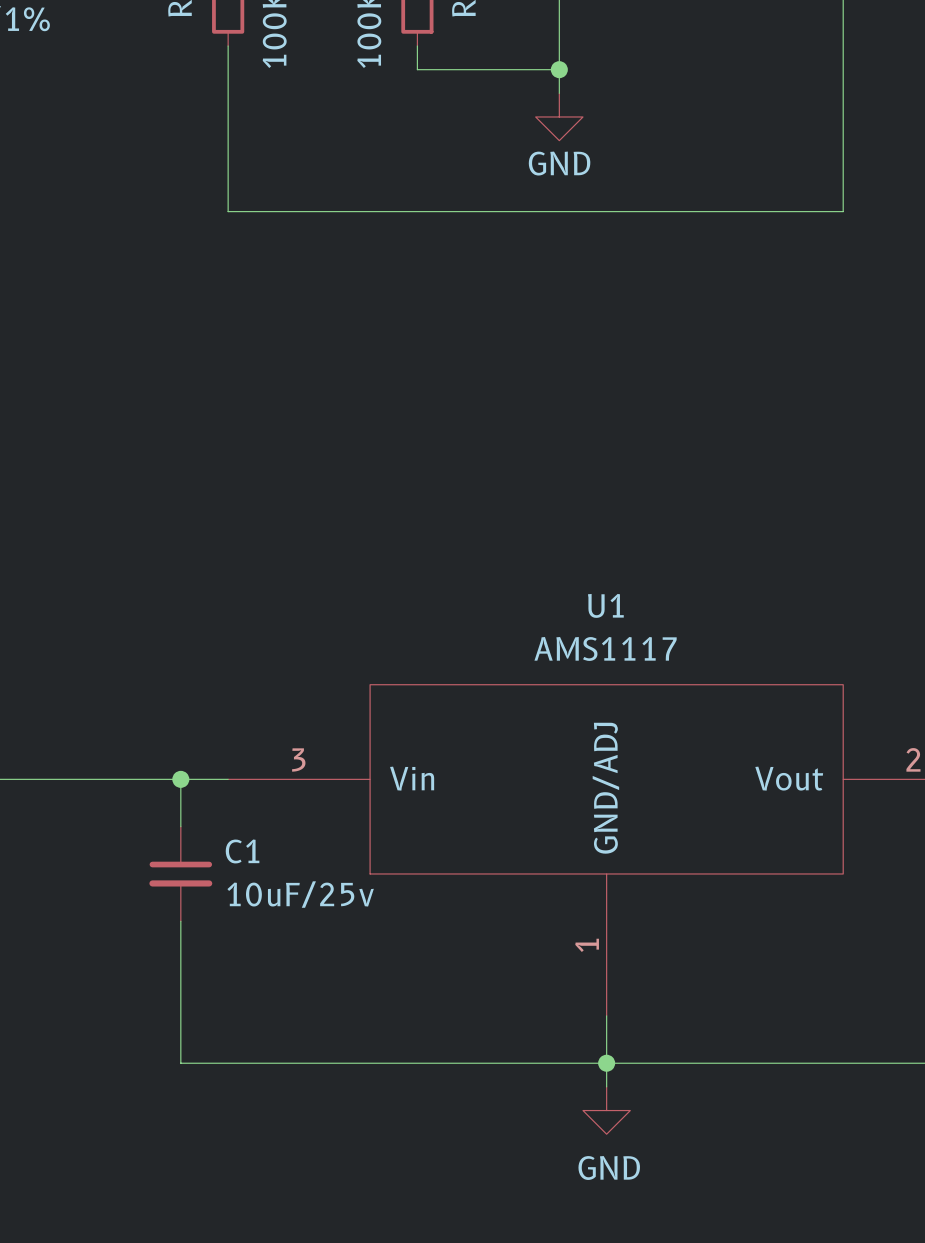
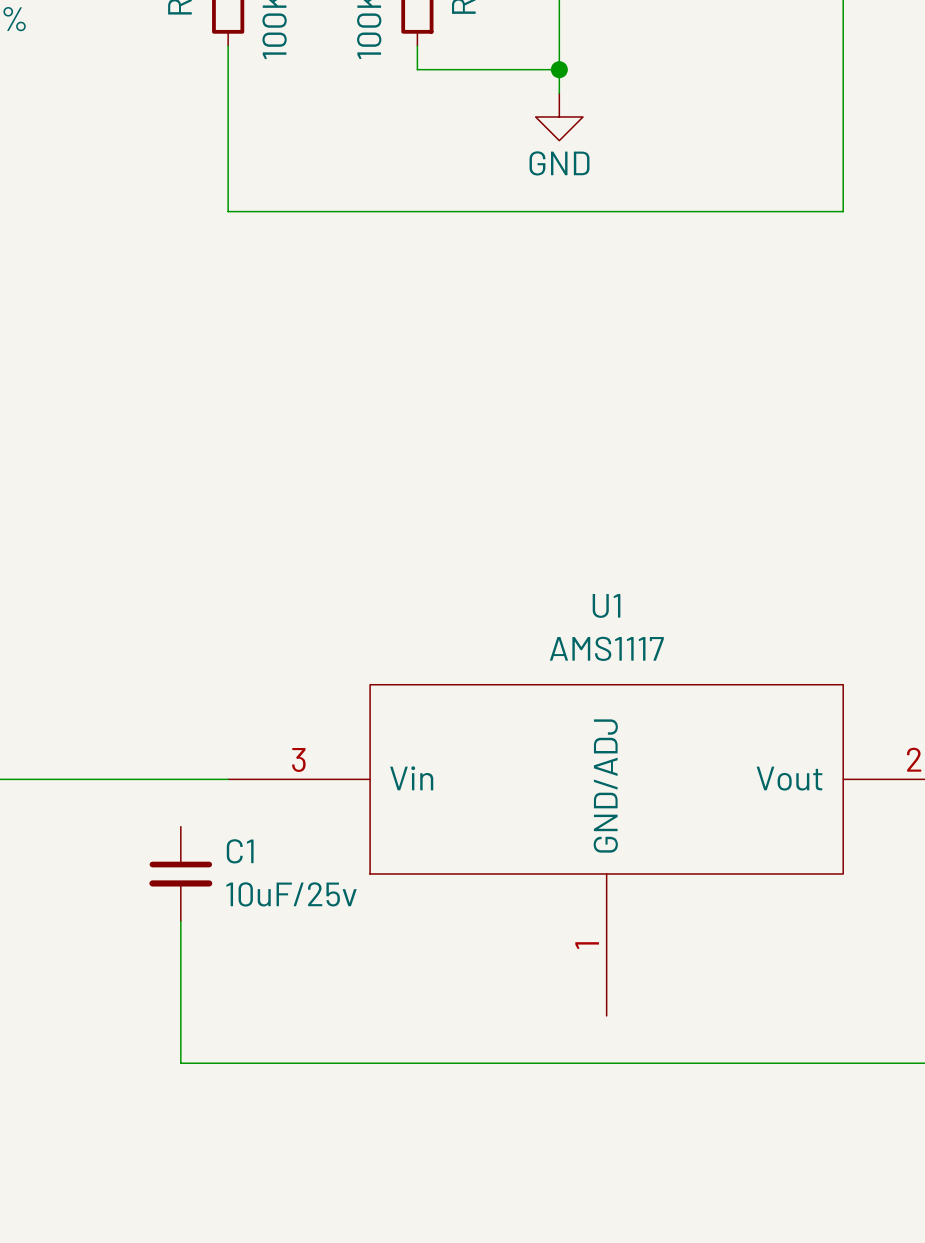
wire: (180, 779) (180, 826) -> none
junction: (180, 779) -> none
wire: (606, 1015) (606, 1086) -> none
junction: (606, 1063) -> none
power symbol: GND (606, 1110) -> none

